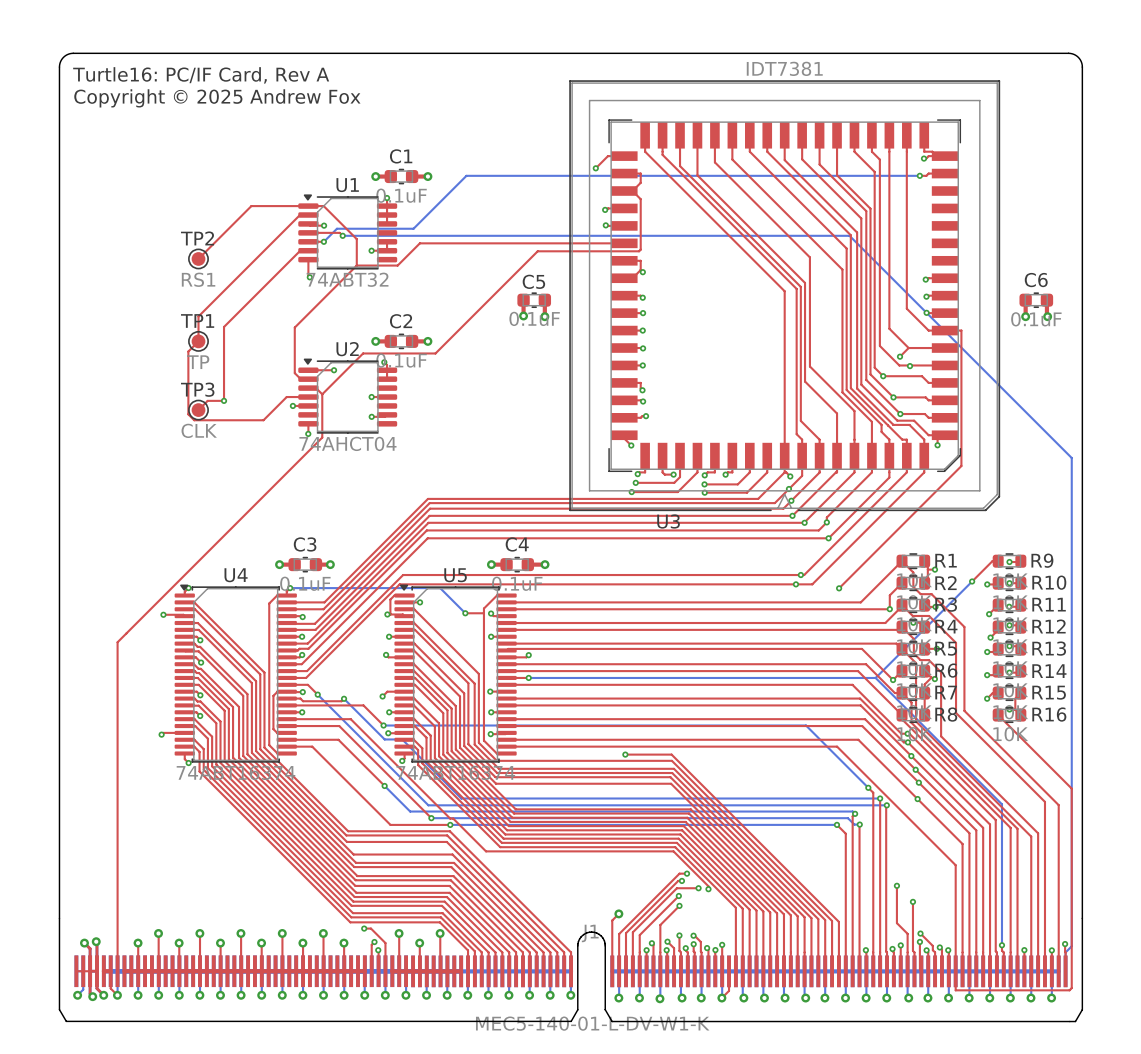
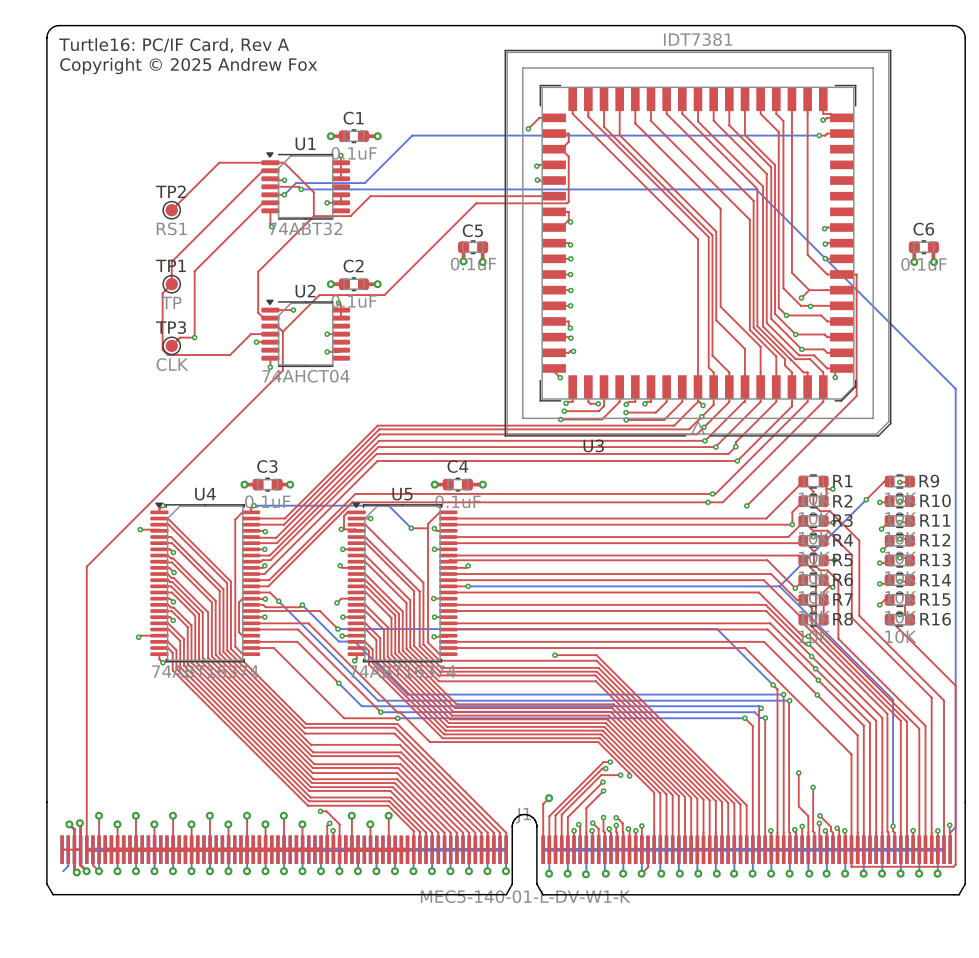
top track: (117, 642) (117, 933) -> (99, 554) (86, 566) (86, 849)
via position: (77, 995) -> (98, 815)

